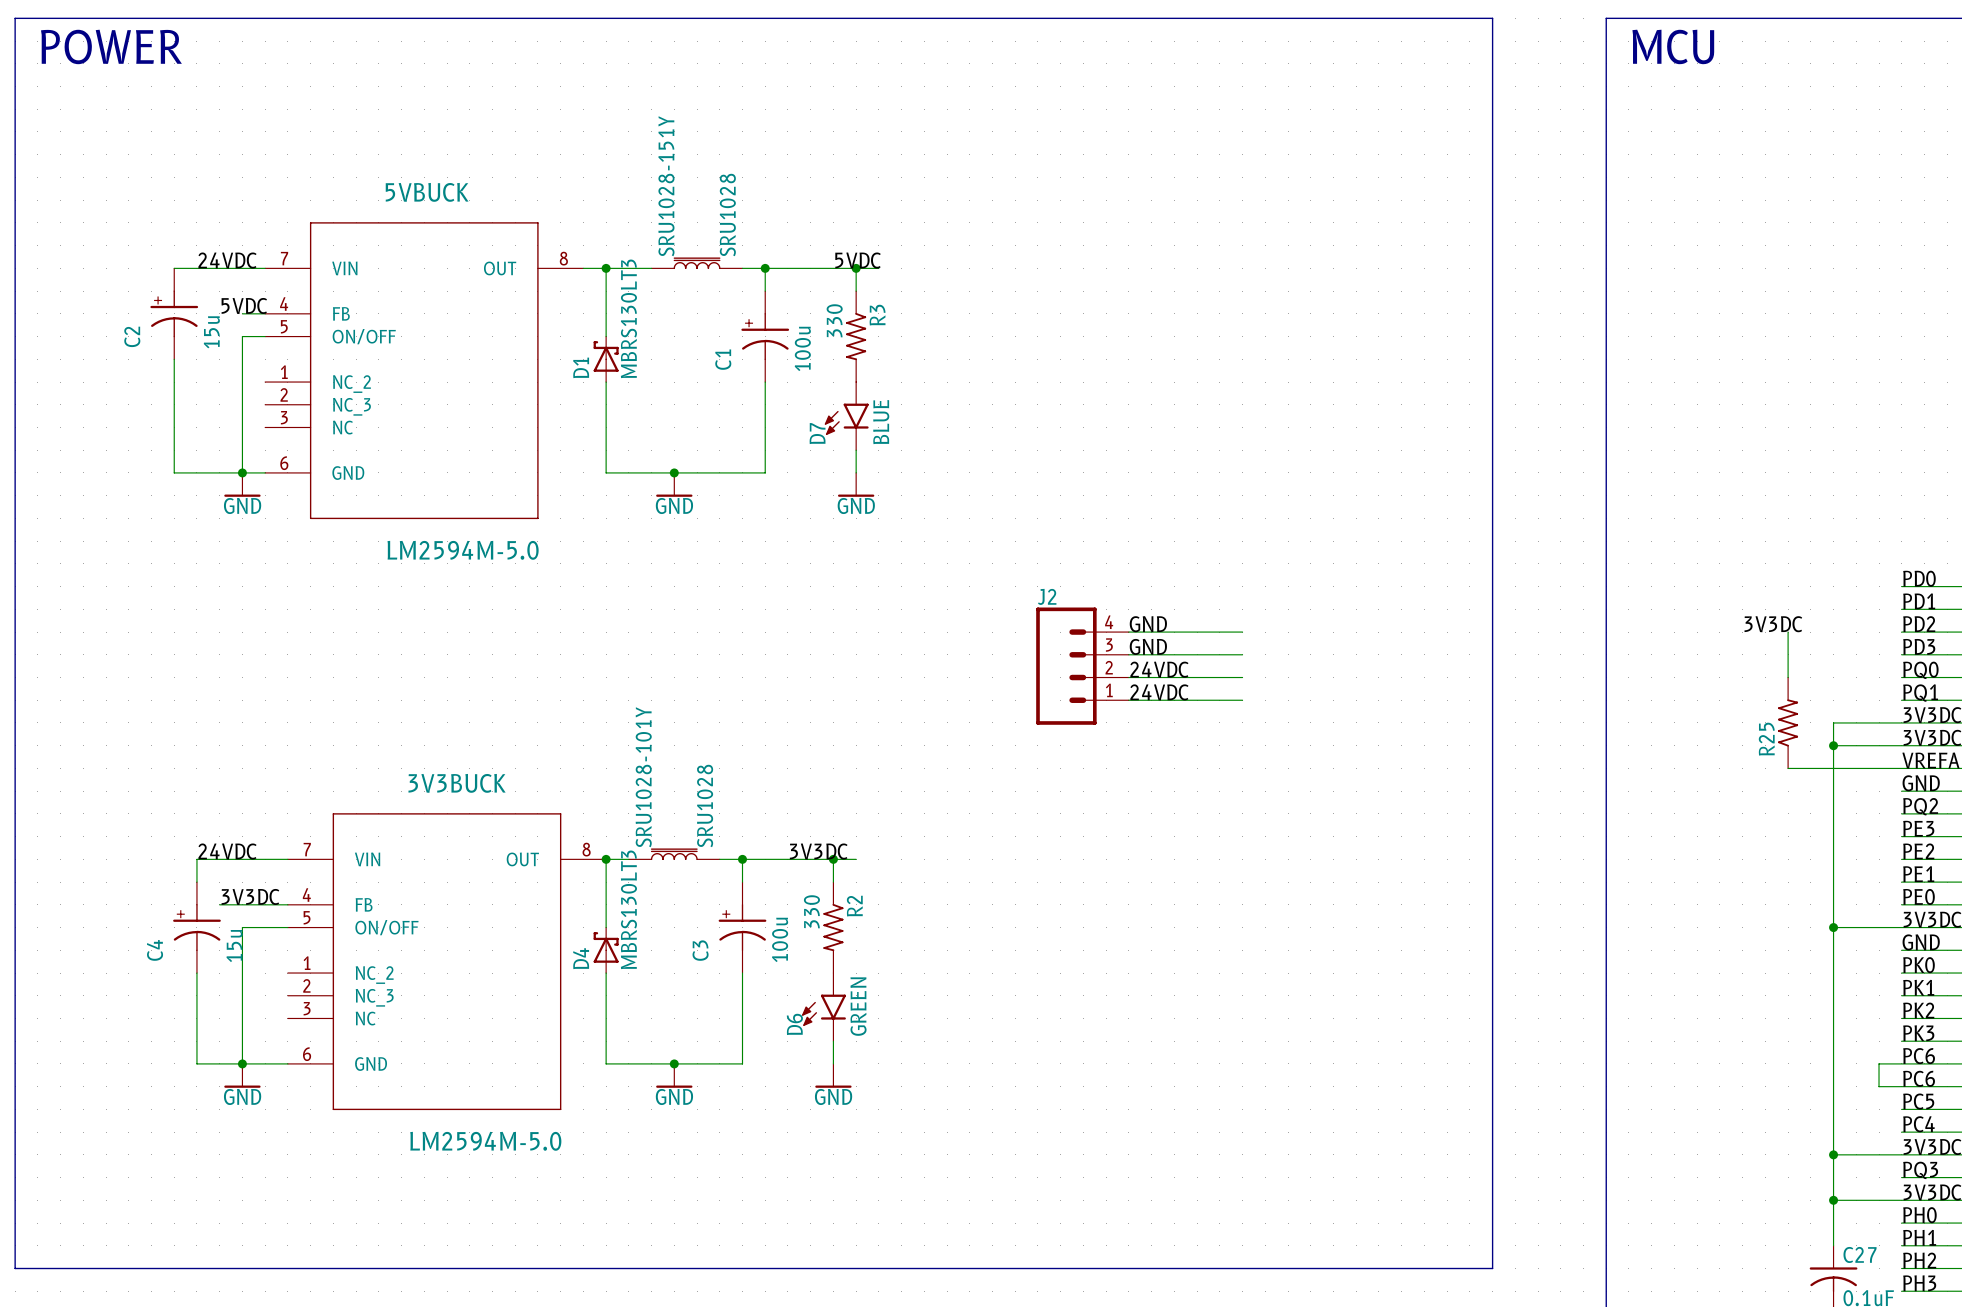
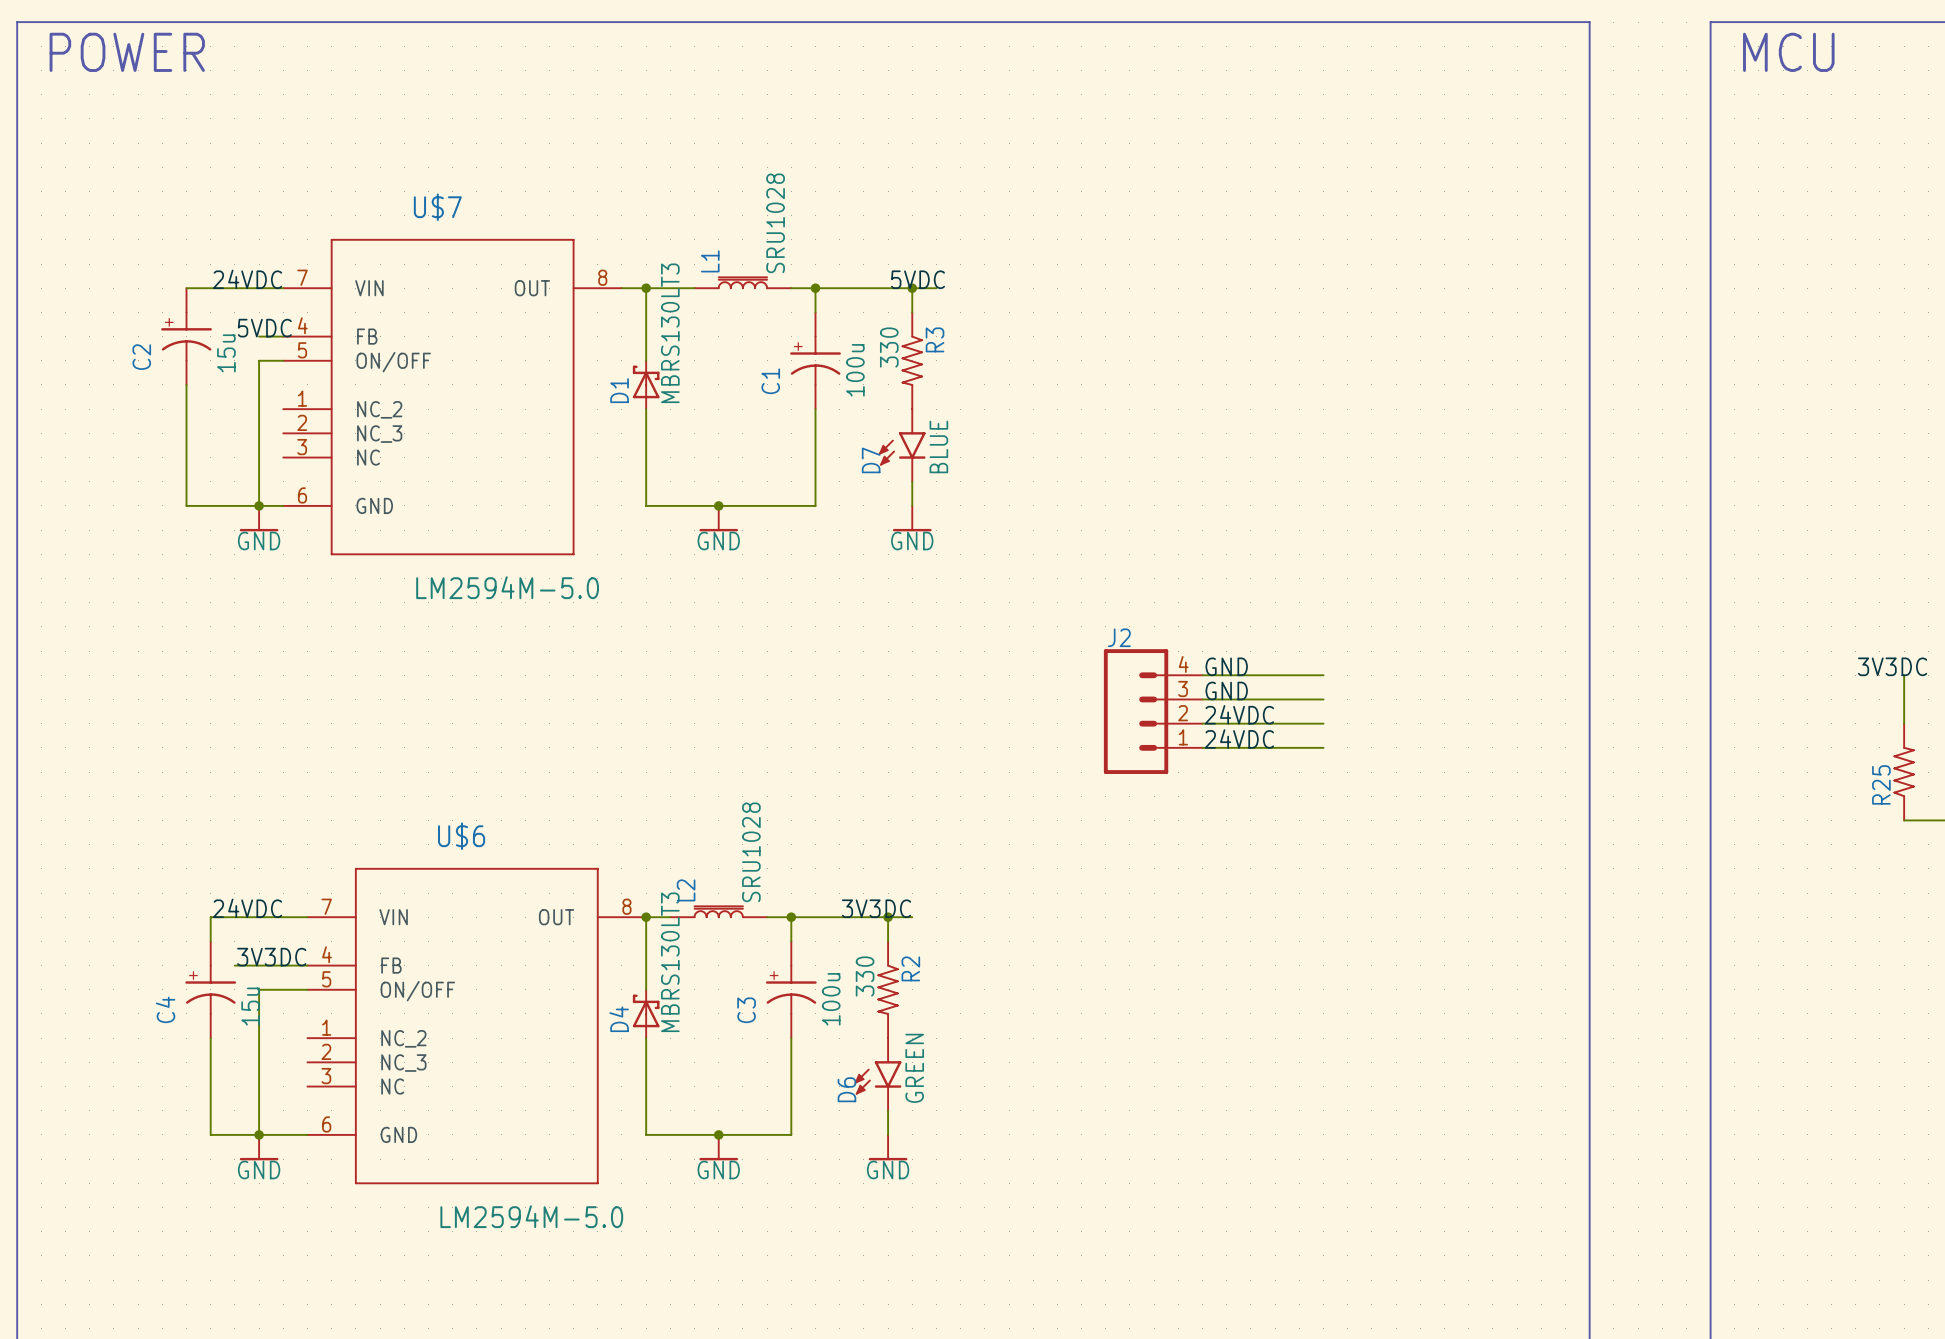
SRU1028-151Y name: SRU1028-151Y (666, 186) -> L1 (710, 261)
5VBUCK name: 5VBUCK (427, 192) -> U$7 (437, 207)
SRU1028-101Y name: SRU1028-101Y (643, 777) -> L2 (686, 890)
3V3BUCK name: 3V3BUCK (457, 783) -> U$6 (461, 836)

